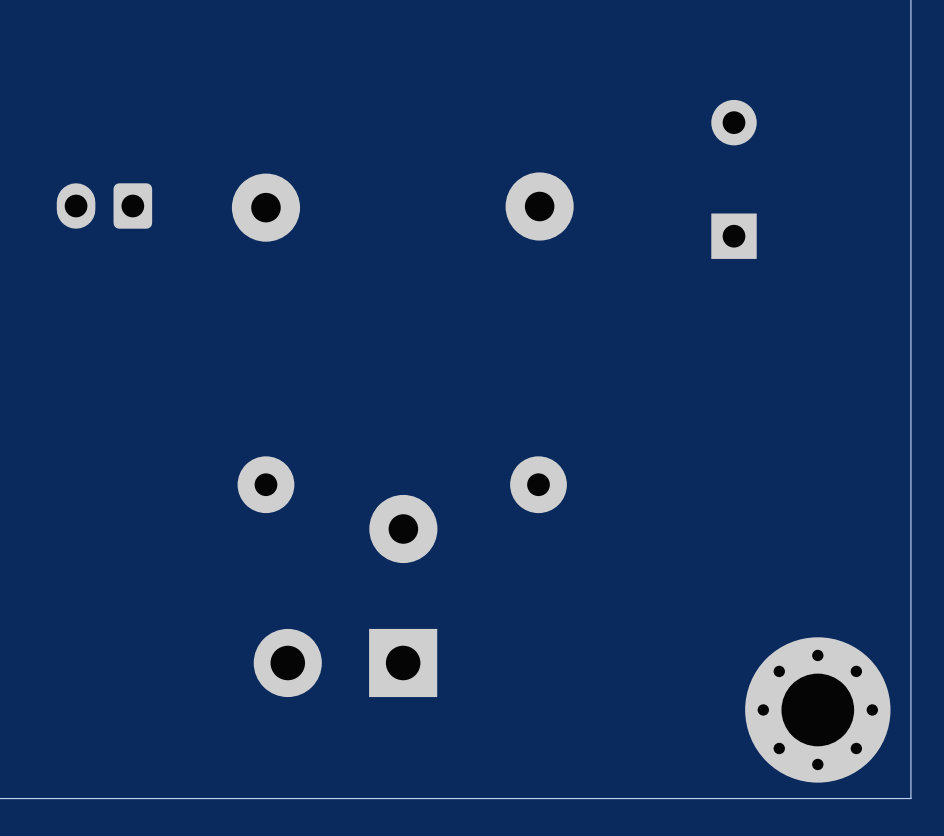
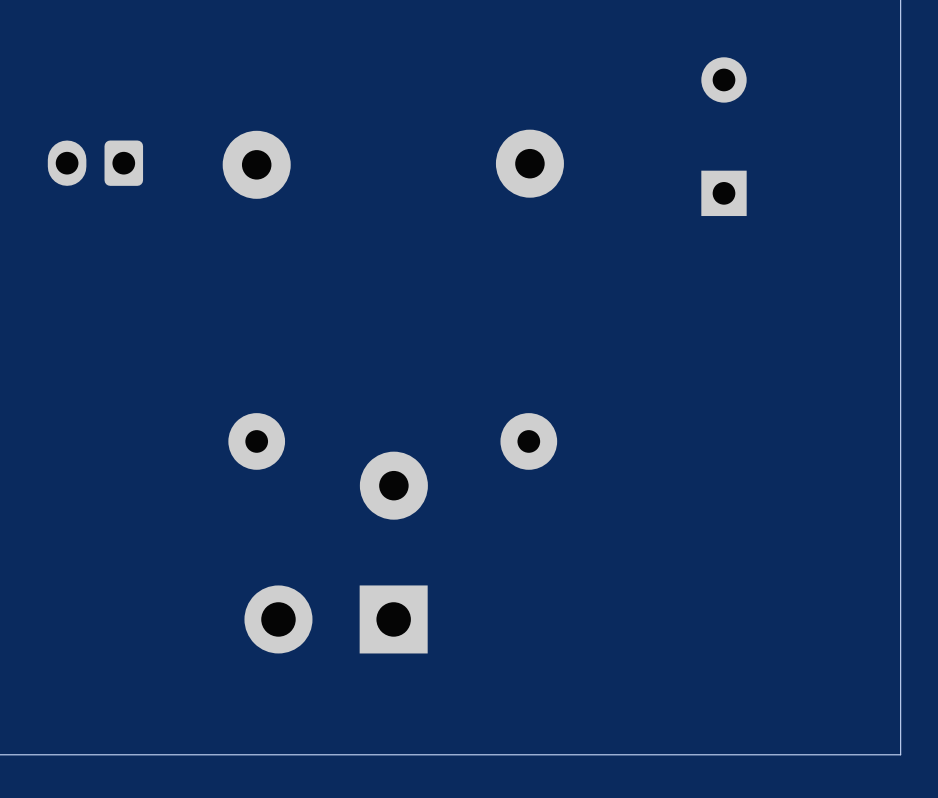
part: (817, 709) -> none

